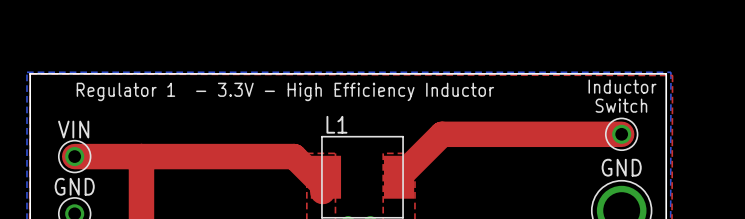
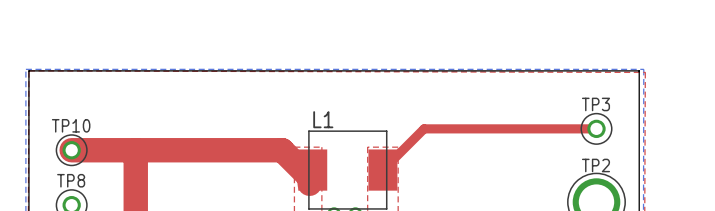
text: Inductor (622, 86) -> none
text: Regulator 1 - 3.3V - High Efficiency Inductor (285, 91) -> none
text: Switch (621, 105) -> none
TP3 name: none -> TP3 (595, 104)
text: VIN (73, 129) -> none
TP10 name: none -> TP10 (71, 125)
top track width: thick (621, 134) (442, 134) (399, 177) -> thin (596, 128) (424, 128) (382, 170)
text: GND (621, 167) -> none
TP2 name: none -> TP2 (595, 165)
text: GND (74, 186) -> none
TP8 name: none -> TP8 (71, 180)

